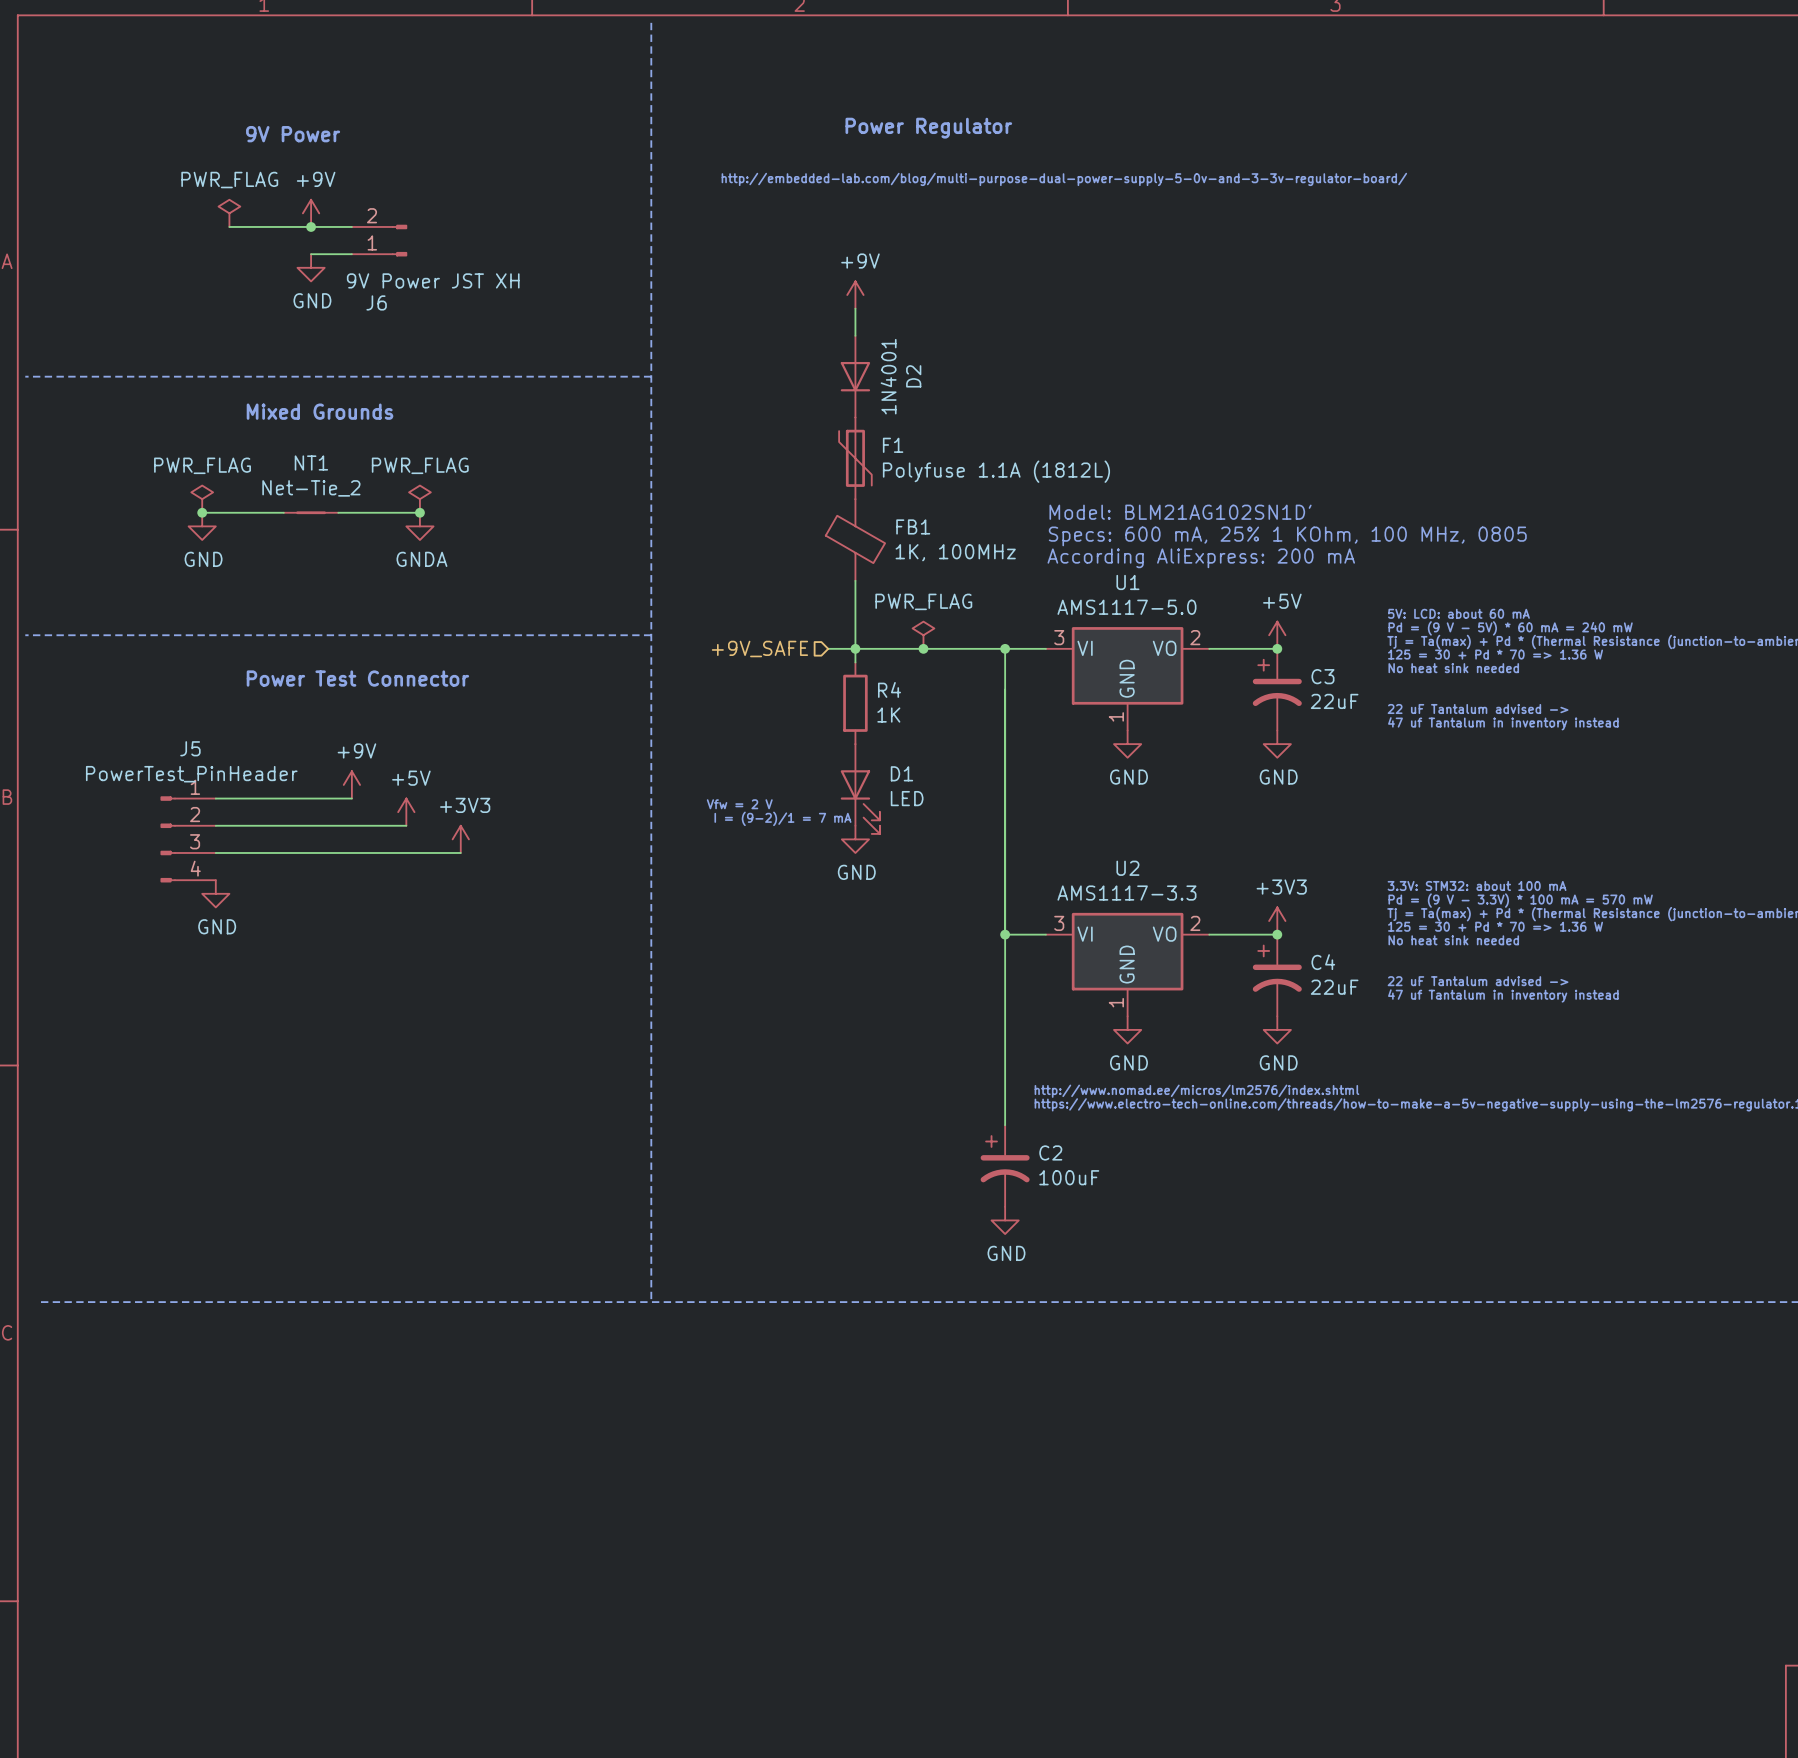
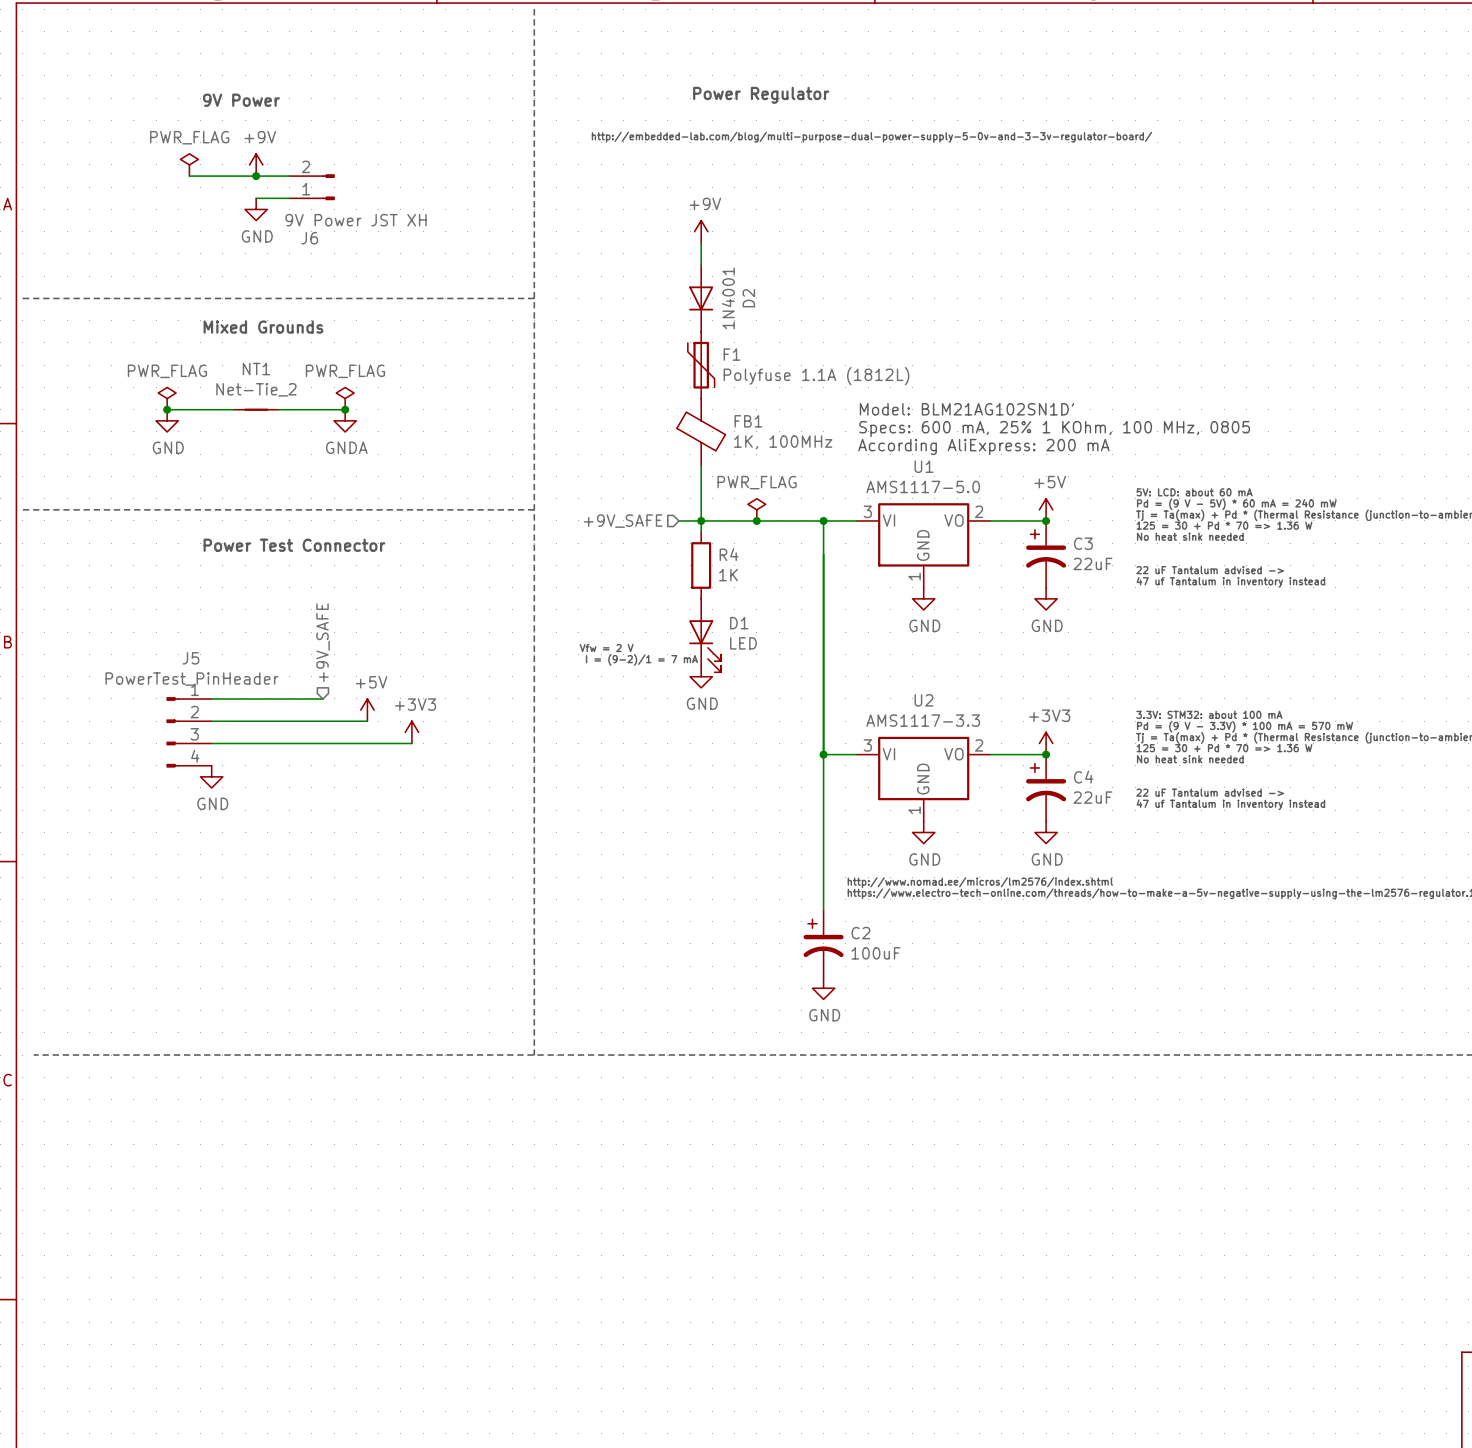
power symbol: +9V (351, 784) -> none
hierarchical label: none -> +9V_SAFE (323, 642)
wire: (215, 798) (351, 798) -> (211, 698) (322, 698)
power symbol position: +5V (406, 812) -> +5V (367, 710)
wire: (215, 825) (406, 825) -> (211, 721) (367, 721)
J5 position: (188, 839) -> (189, 732)
power symbol position: +3V3 (460, 839) -> +3V3 (411, 732)
wire: (215, 852) (460, 852) -> (211, 743) (411, 743)
power symbol position: GND (215, 893) -> GND (211, 776)

